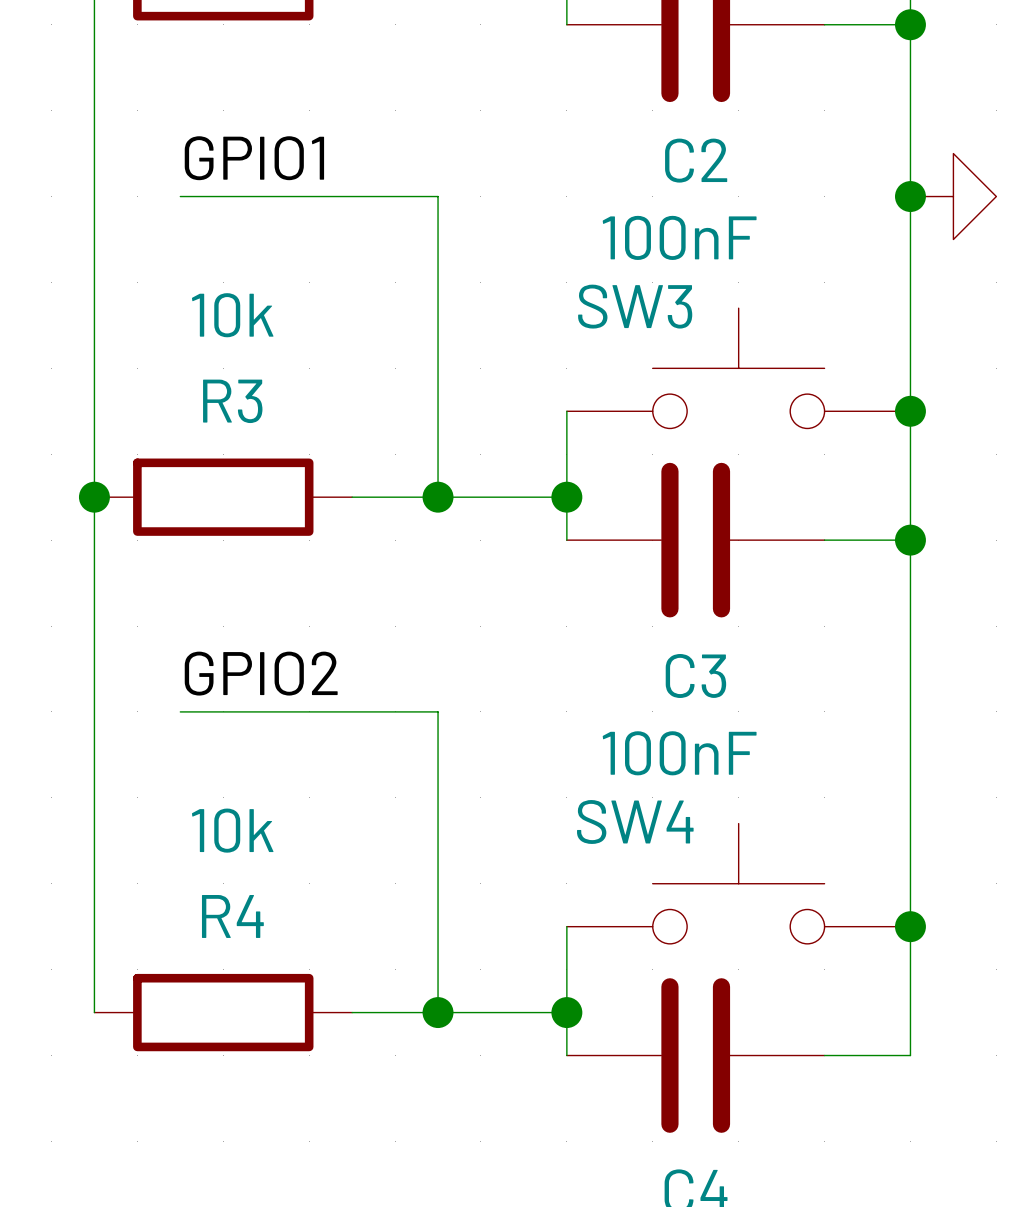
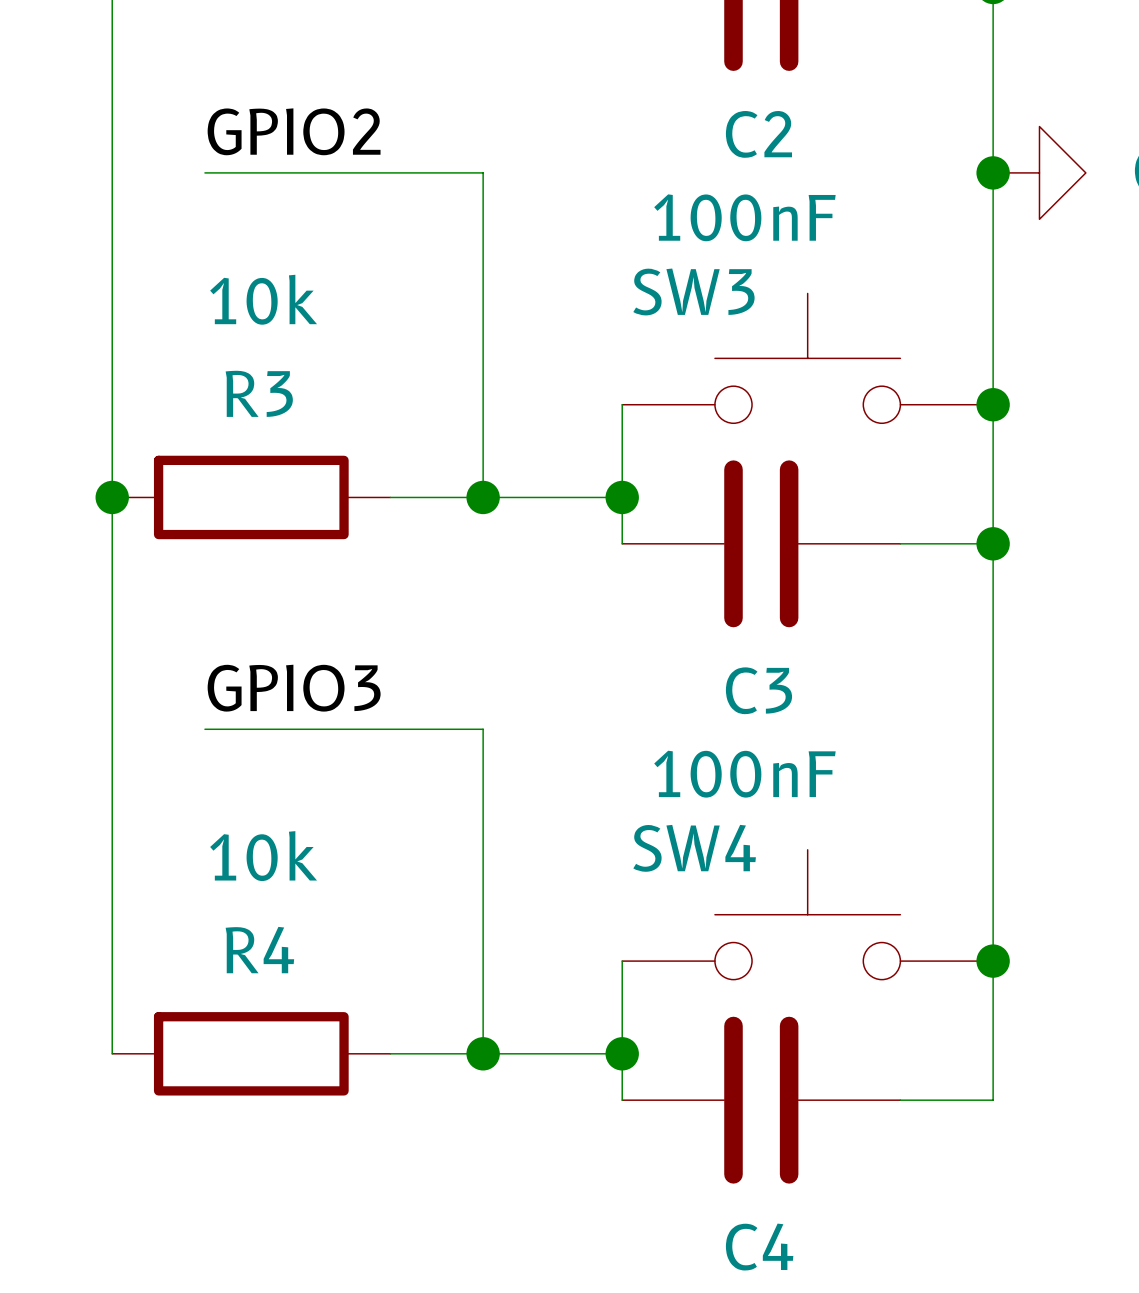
label: GPIO1 (254, 158) -> GPIO2 (294, 131)
label: GPIO2 (261, 673) -> GPIO3 (294, 688)

